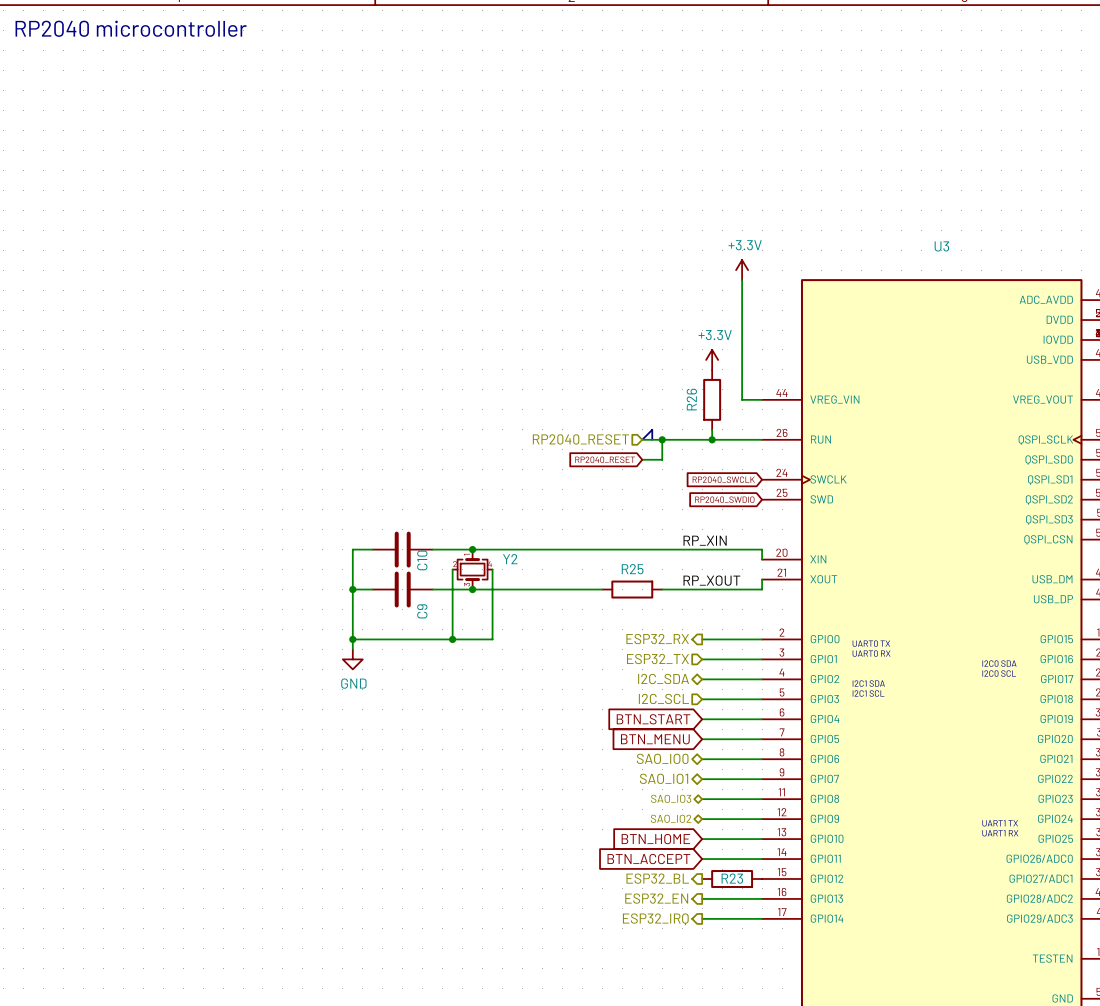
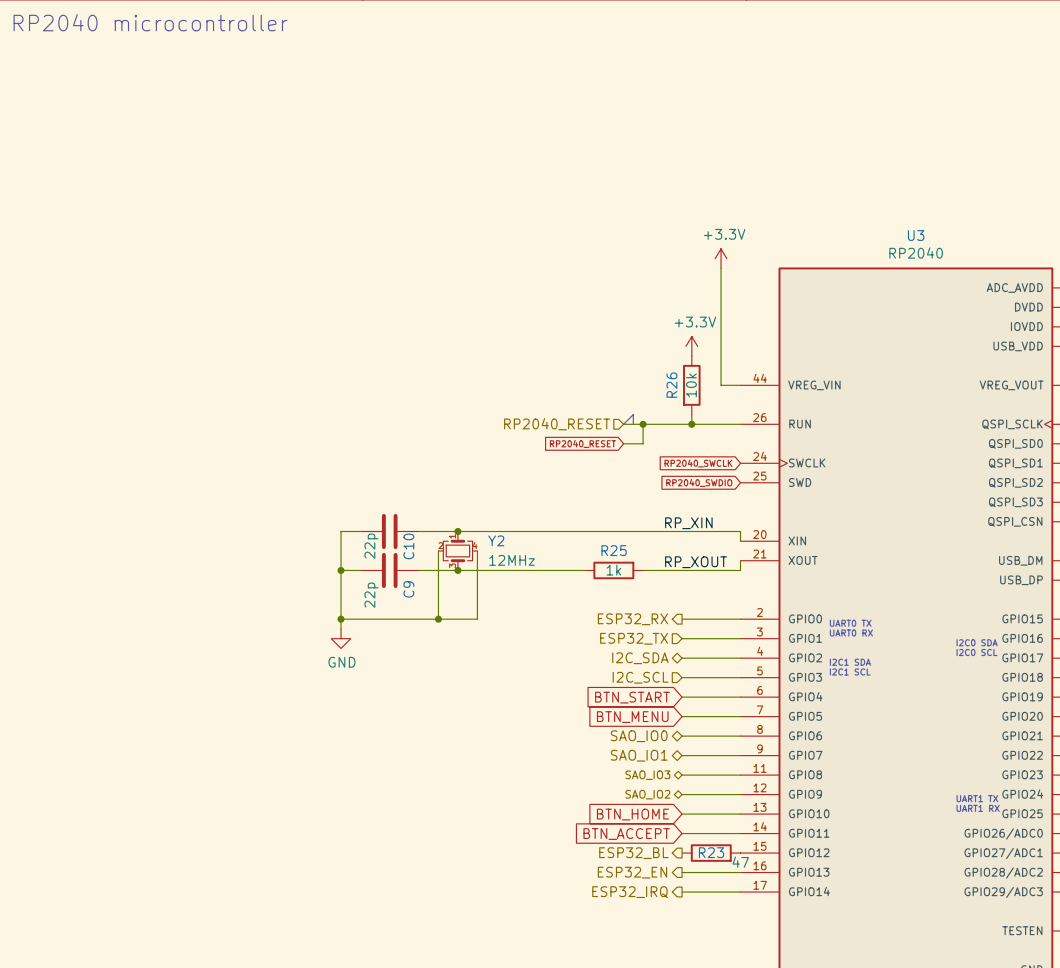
U3 value: none -> RP2040 (916, 253)
R26 value: none -> 10k (691, 385)
C10 value: none -> 22p (371, 546)
Y2 value: none -> 12MHz (512, 560)
R25 value: none -> 1k (613, 570)
C9 value: none -> 22p (371, 595)
R23 value: none -> 47 (740, 862)

